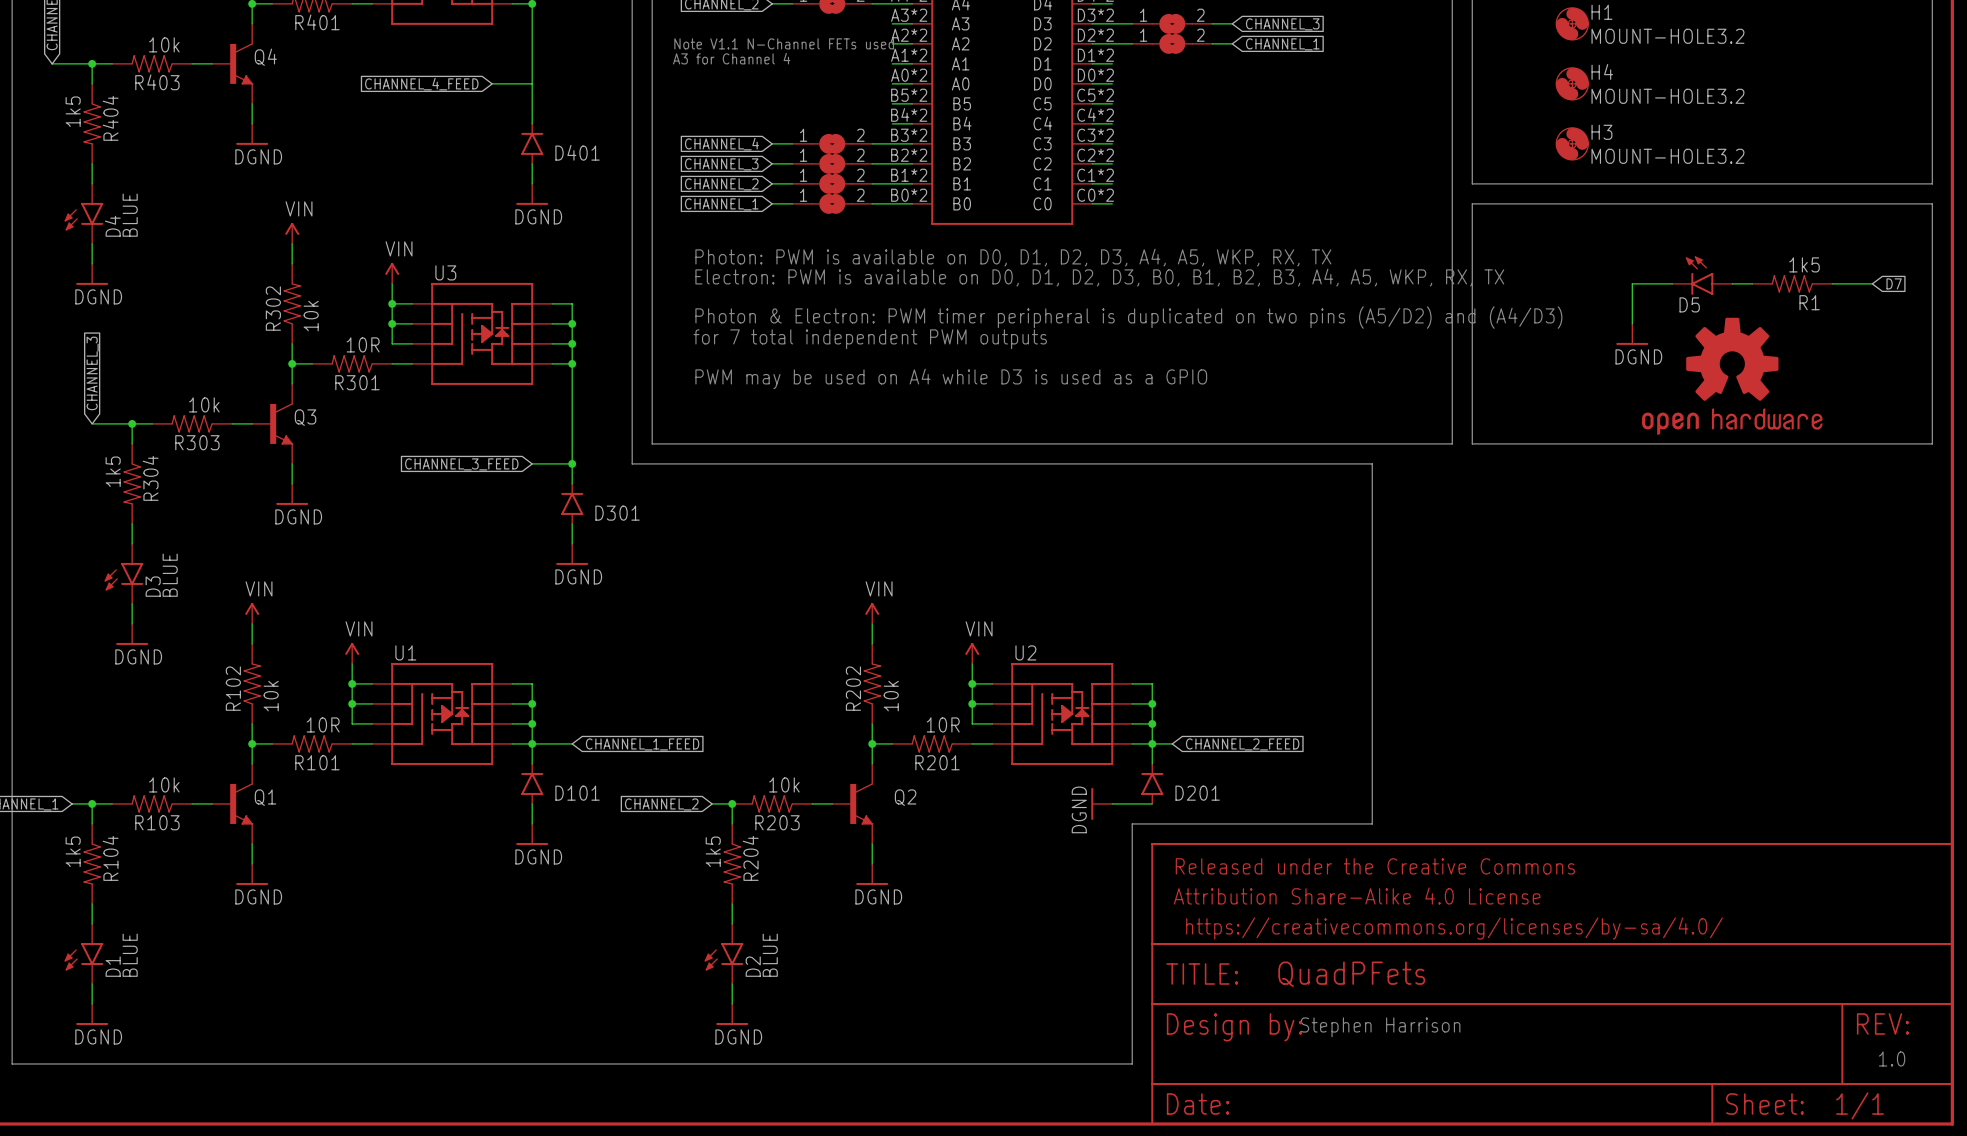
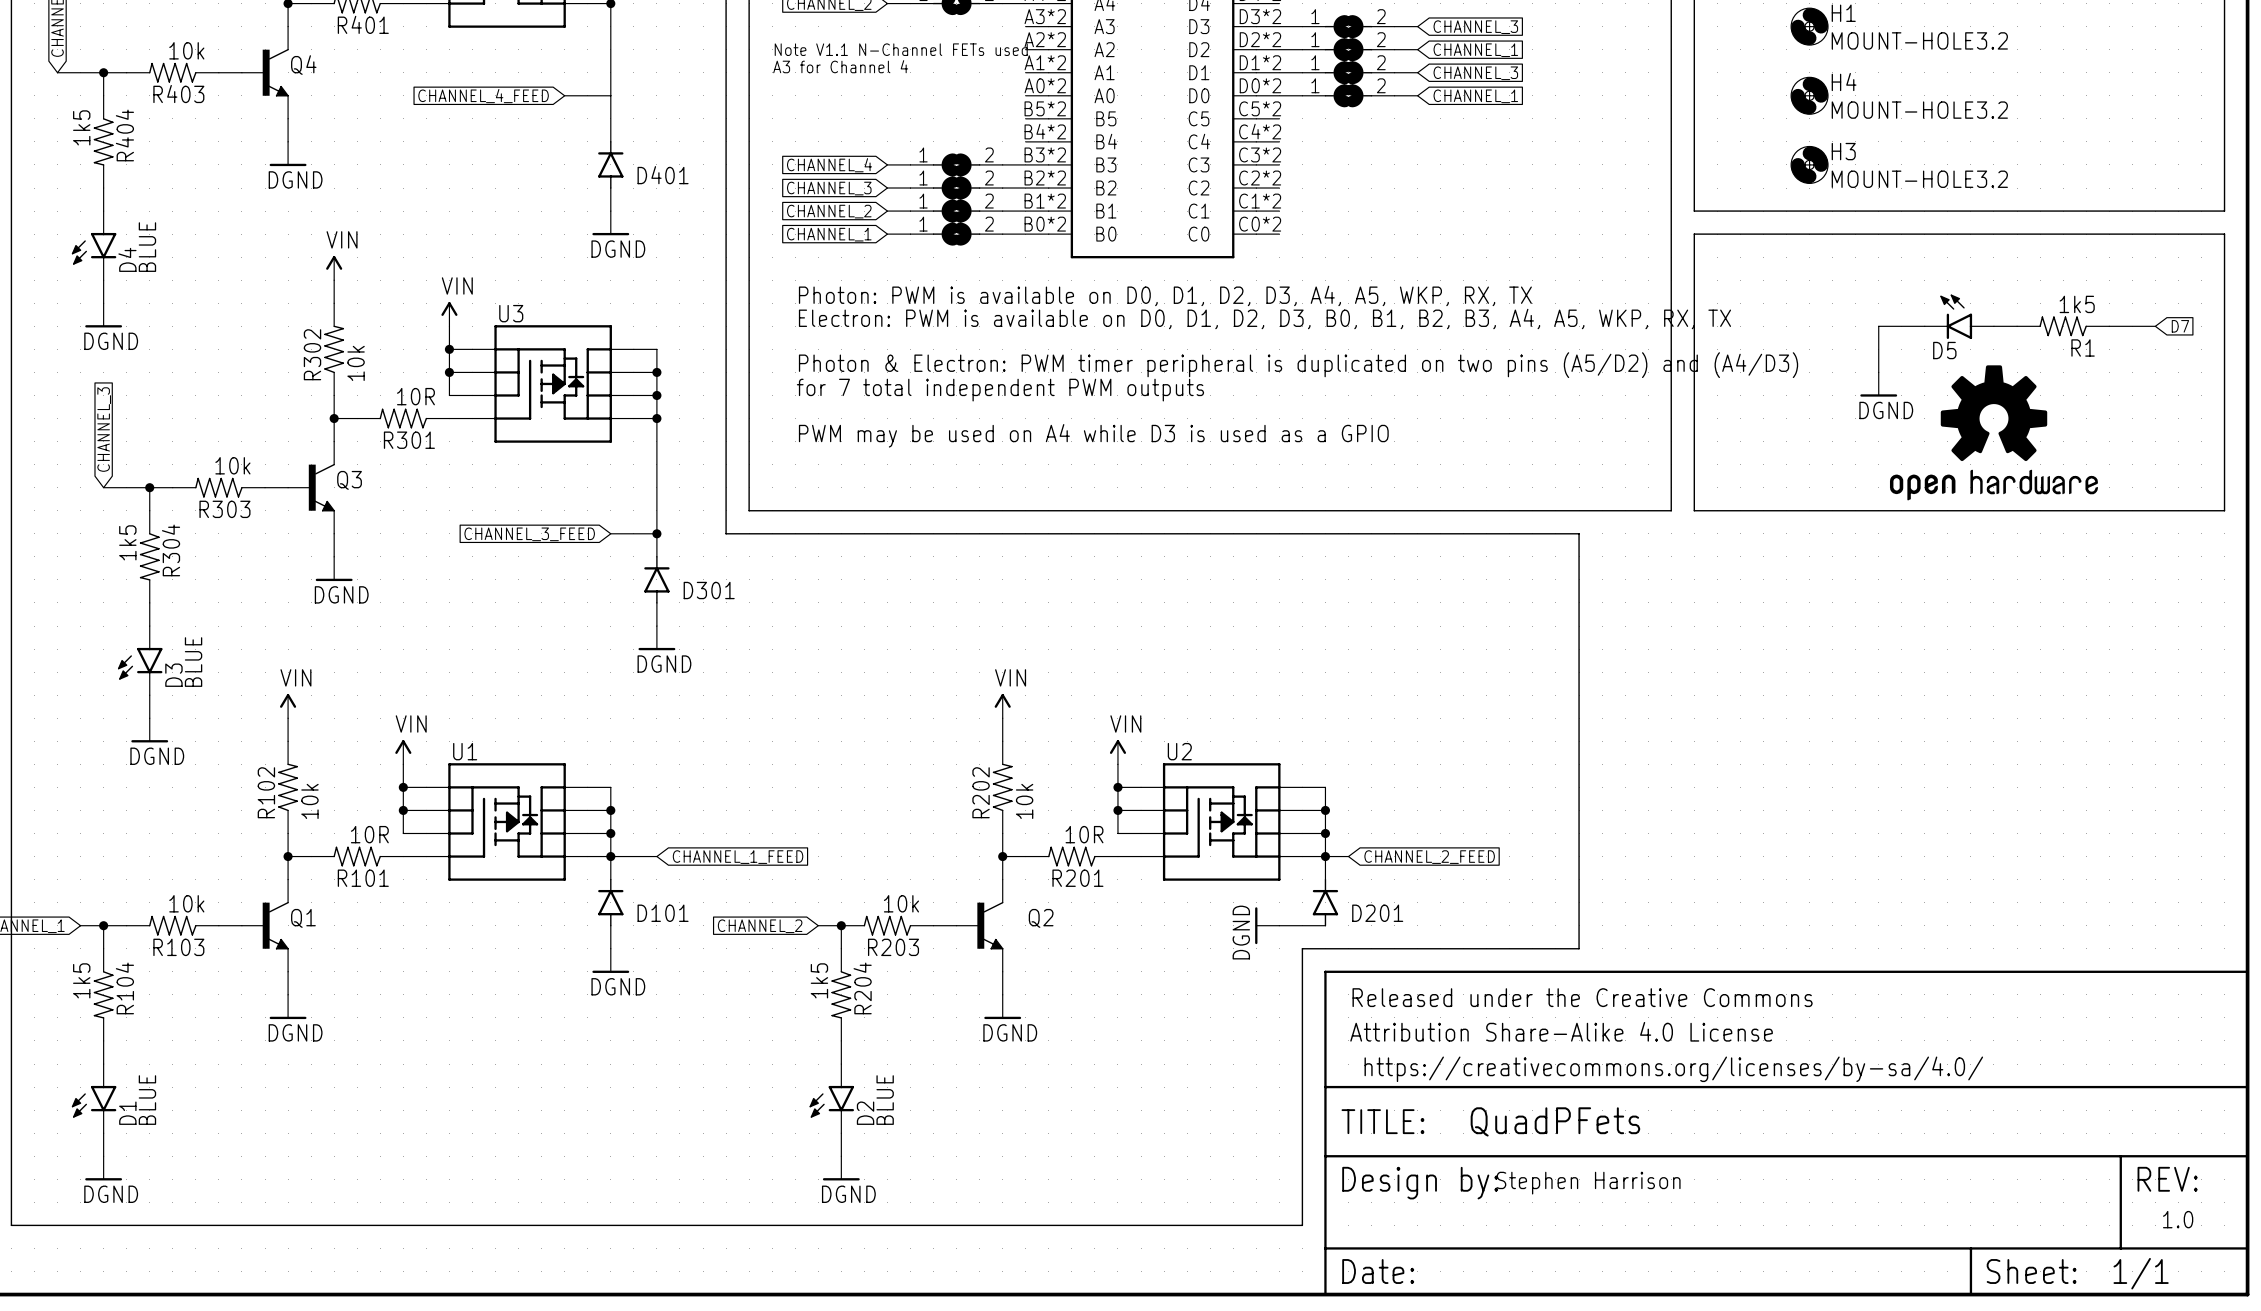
wire: none -> (1279, 72) (1302, 72)
part: none -> (1348, 72)
wire: none -> (1394, 72) (1417, 72)
global label: none -> CHANNEL_3 (1475, 73)
wire: none -> (1279, 95) (1302, 95)
part: none -> (1348, 95)
wire: none -> (1394, 95) (1417, 95)
global label: none -> CHANNEL_1 (1475, 96)

